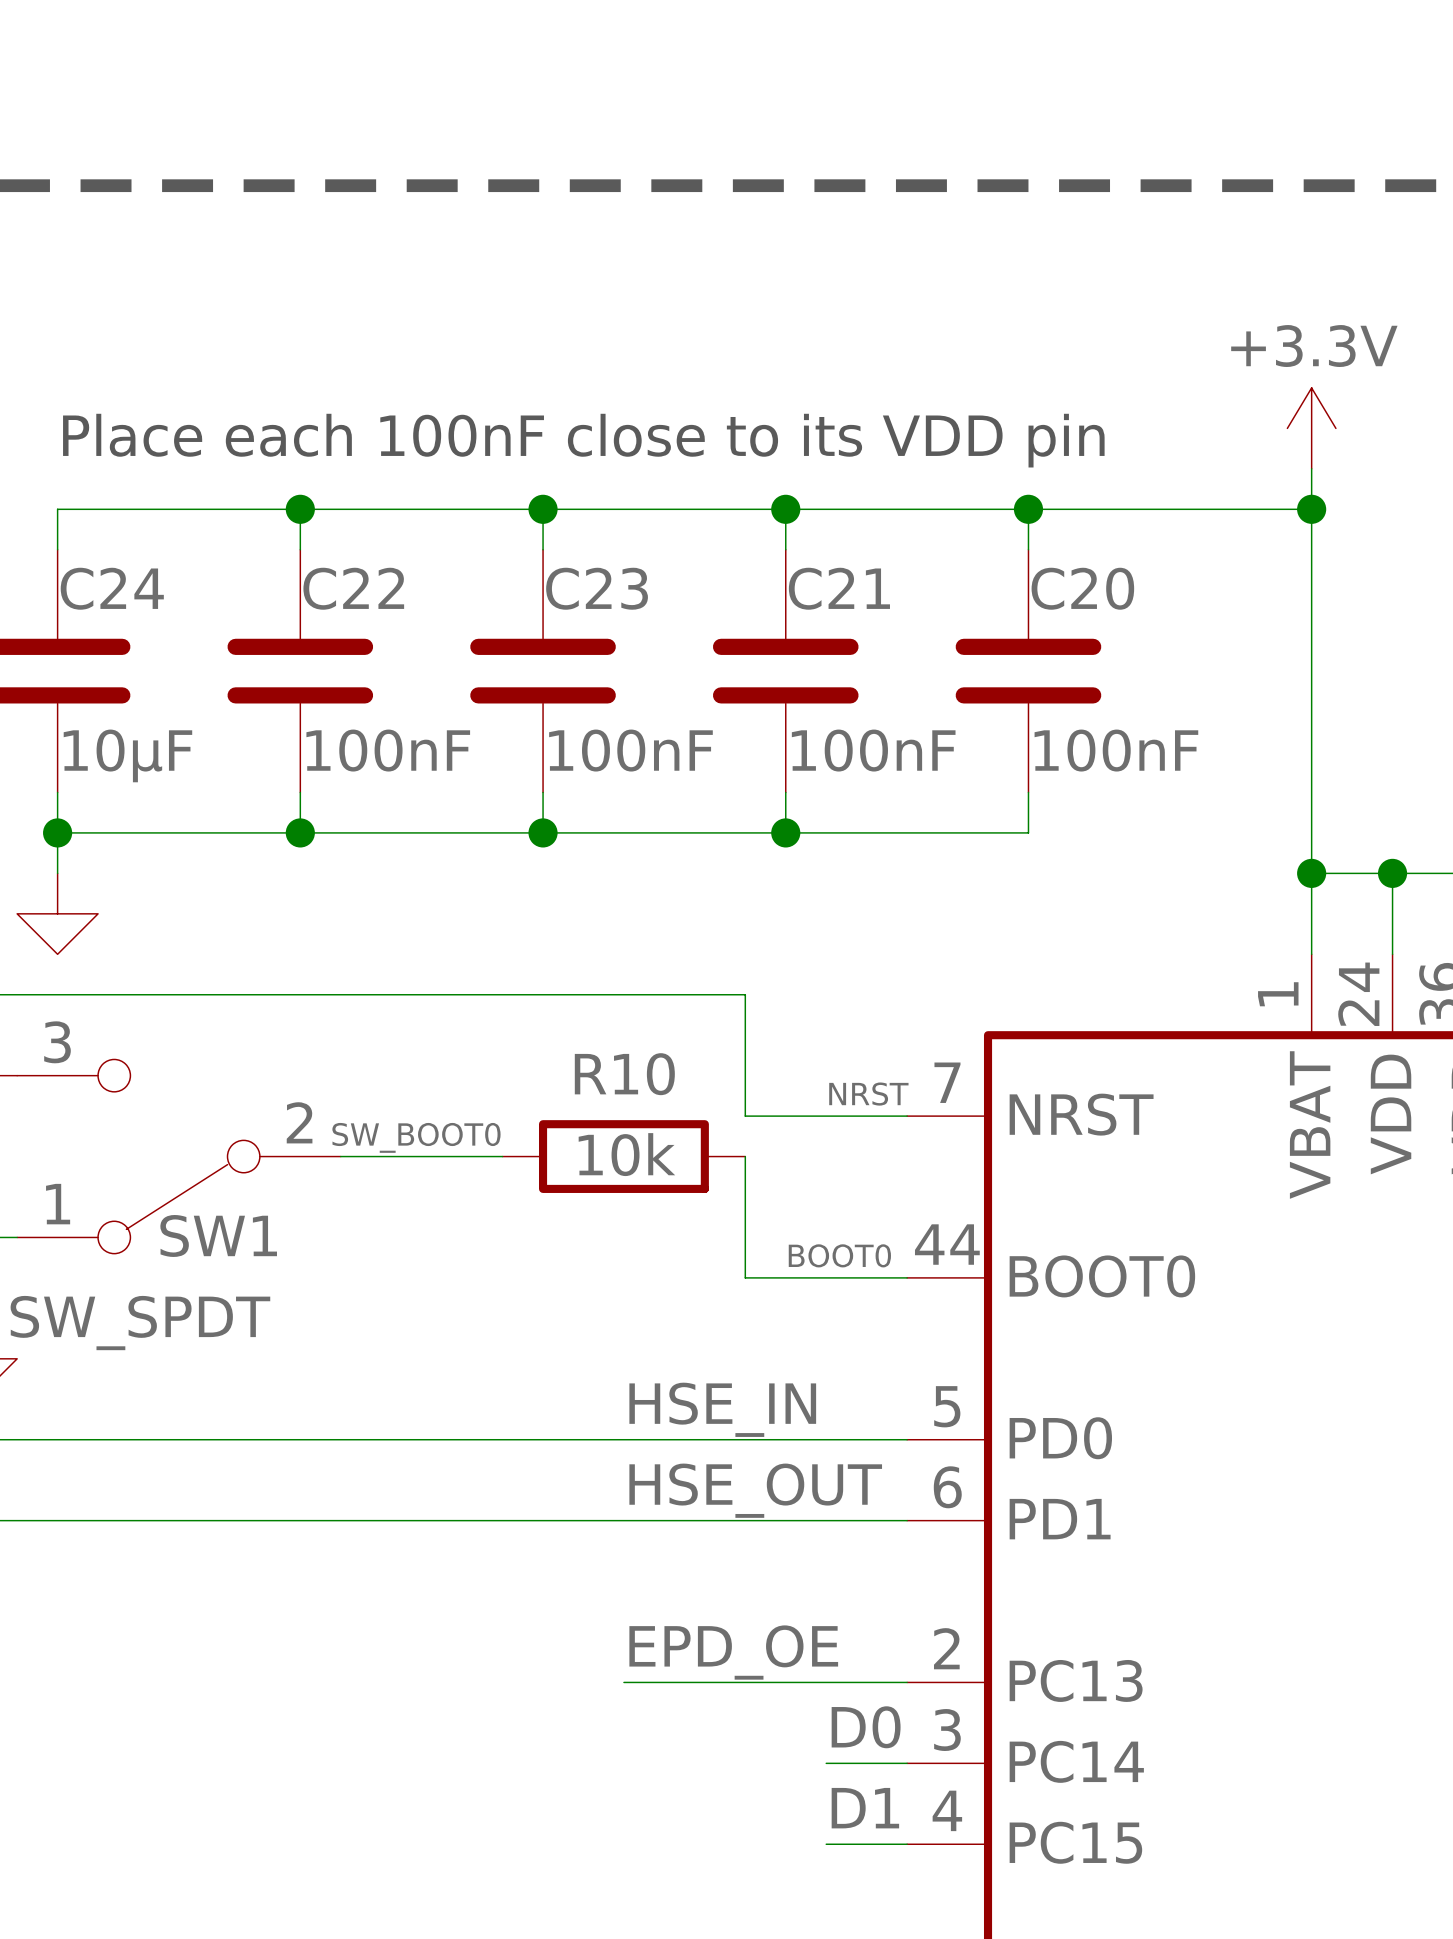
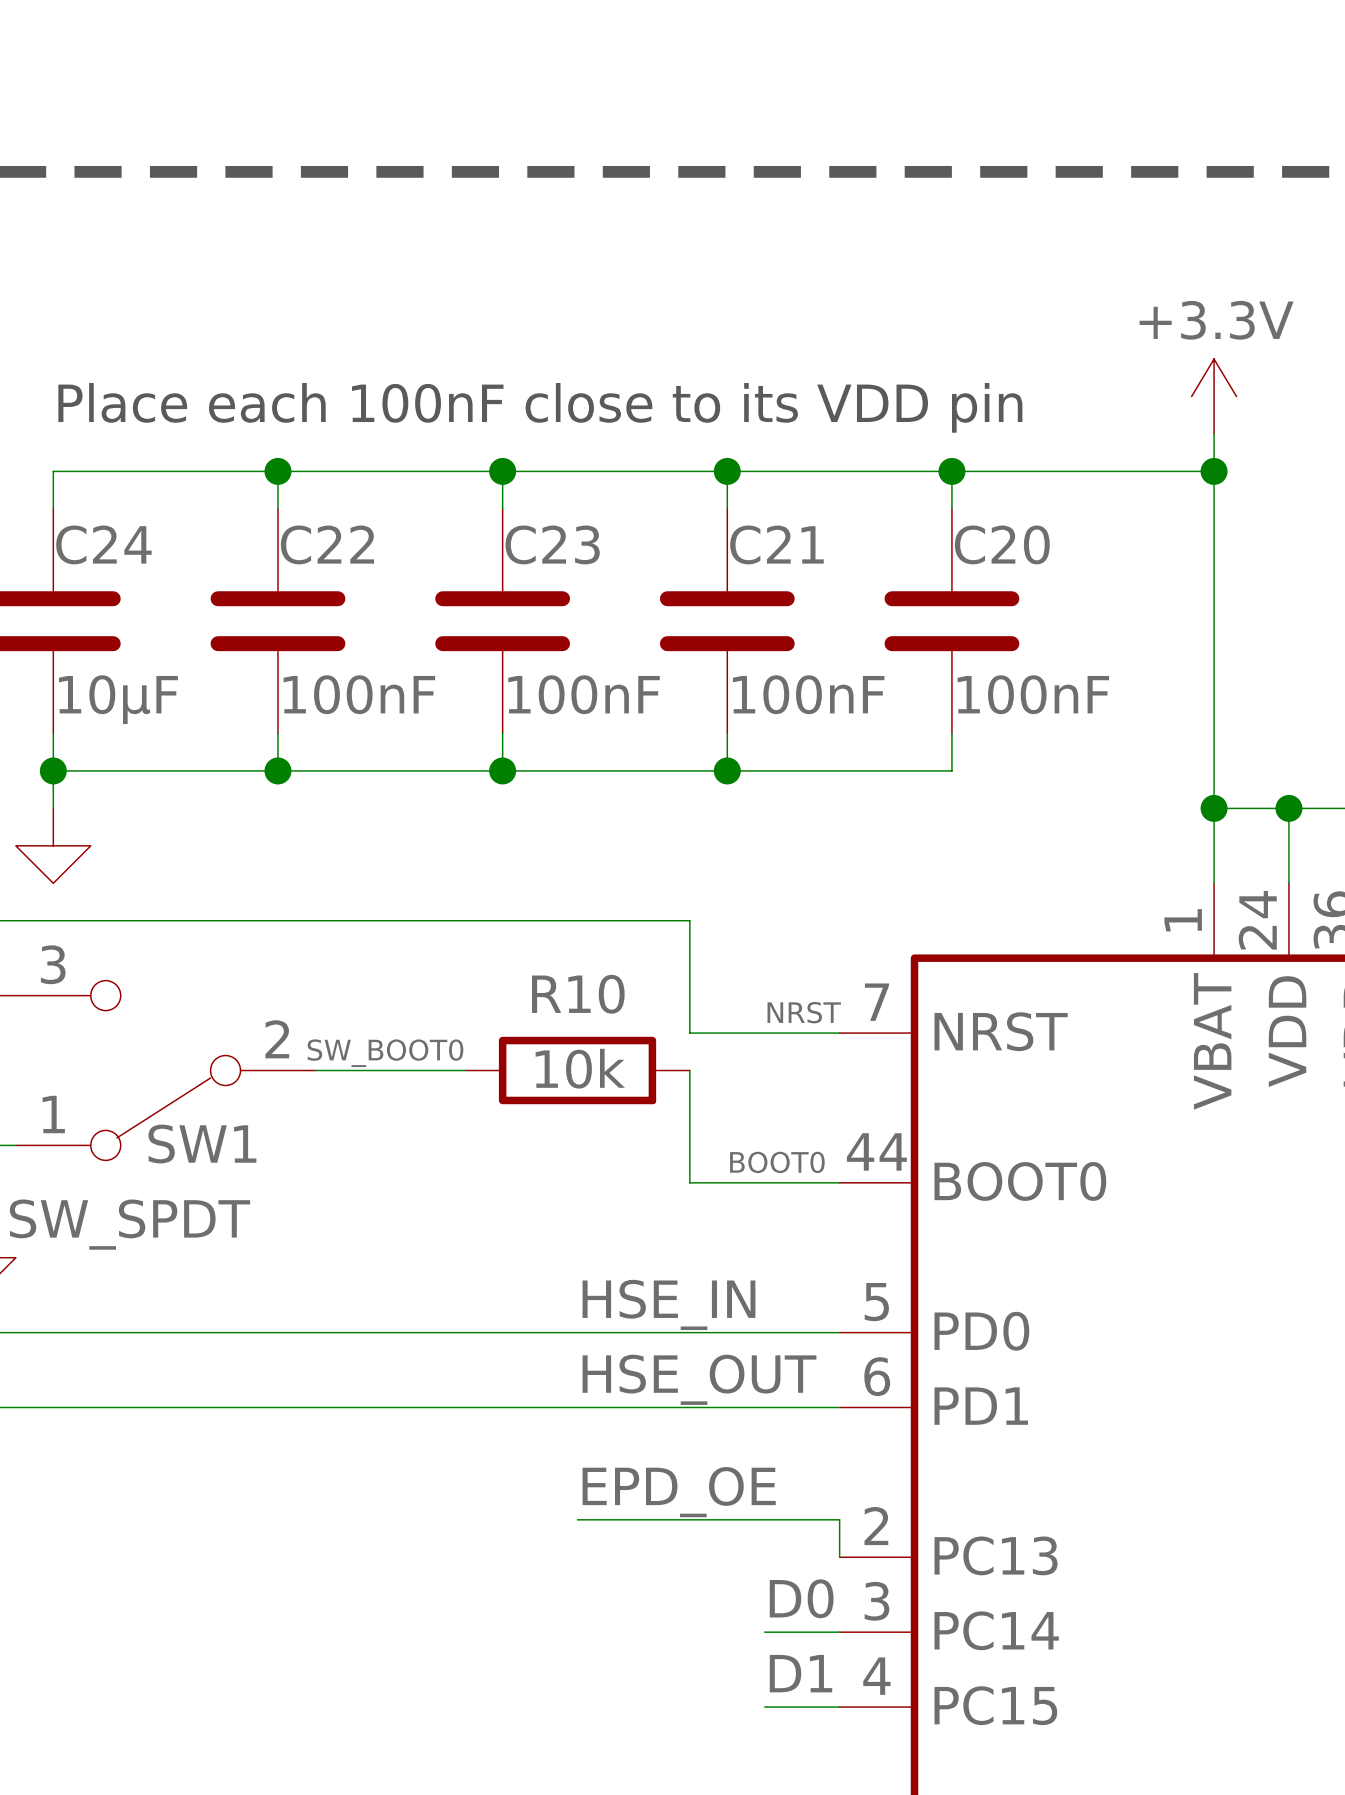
label position: EPD_OE (733, 1652) -> EPD_OE (679, 1492)
wire: (623, 1682) (907, 1682) -> (577, 1519) (839, 1519) (839, 1557)

